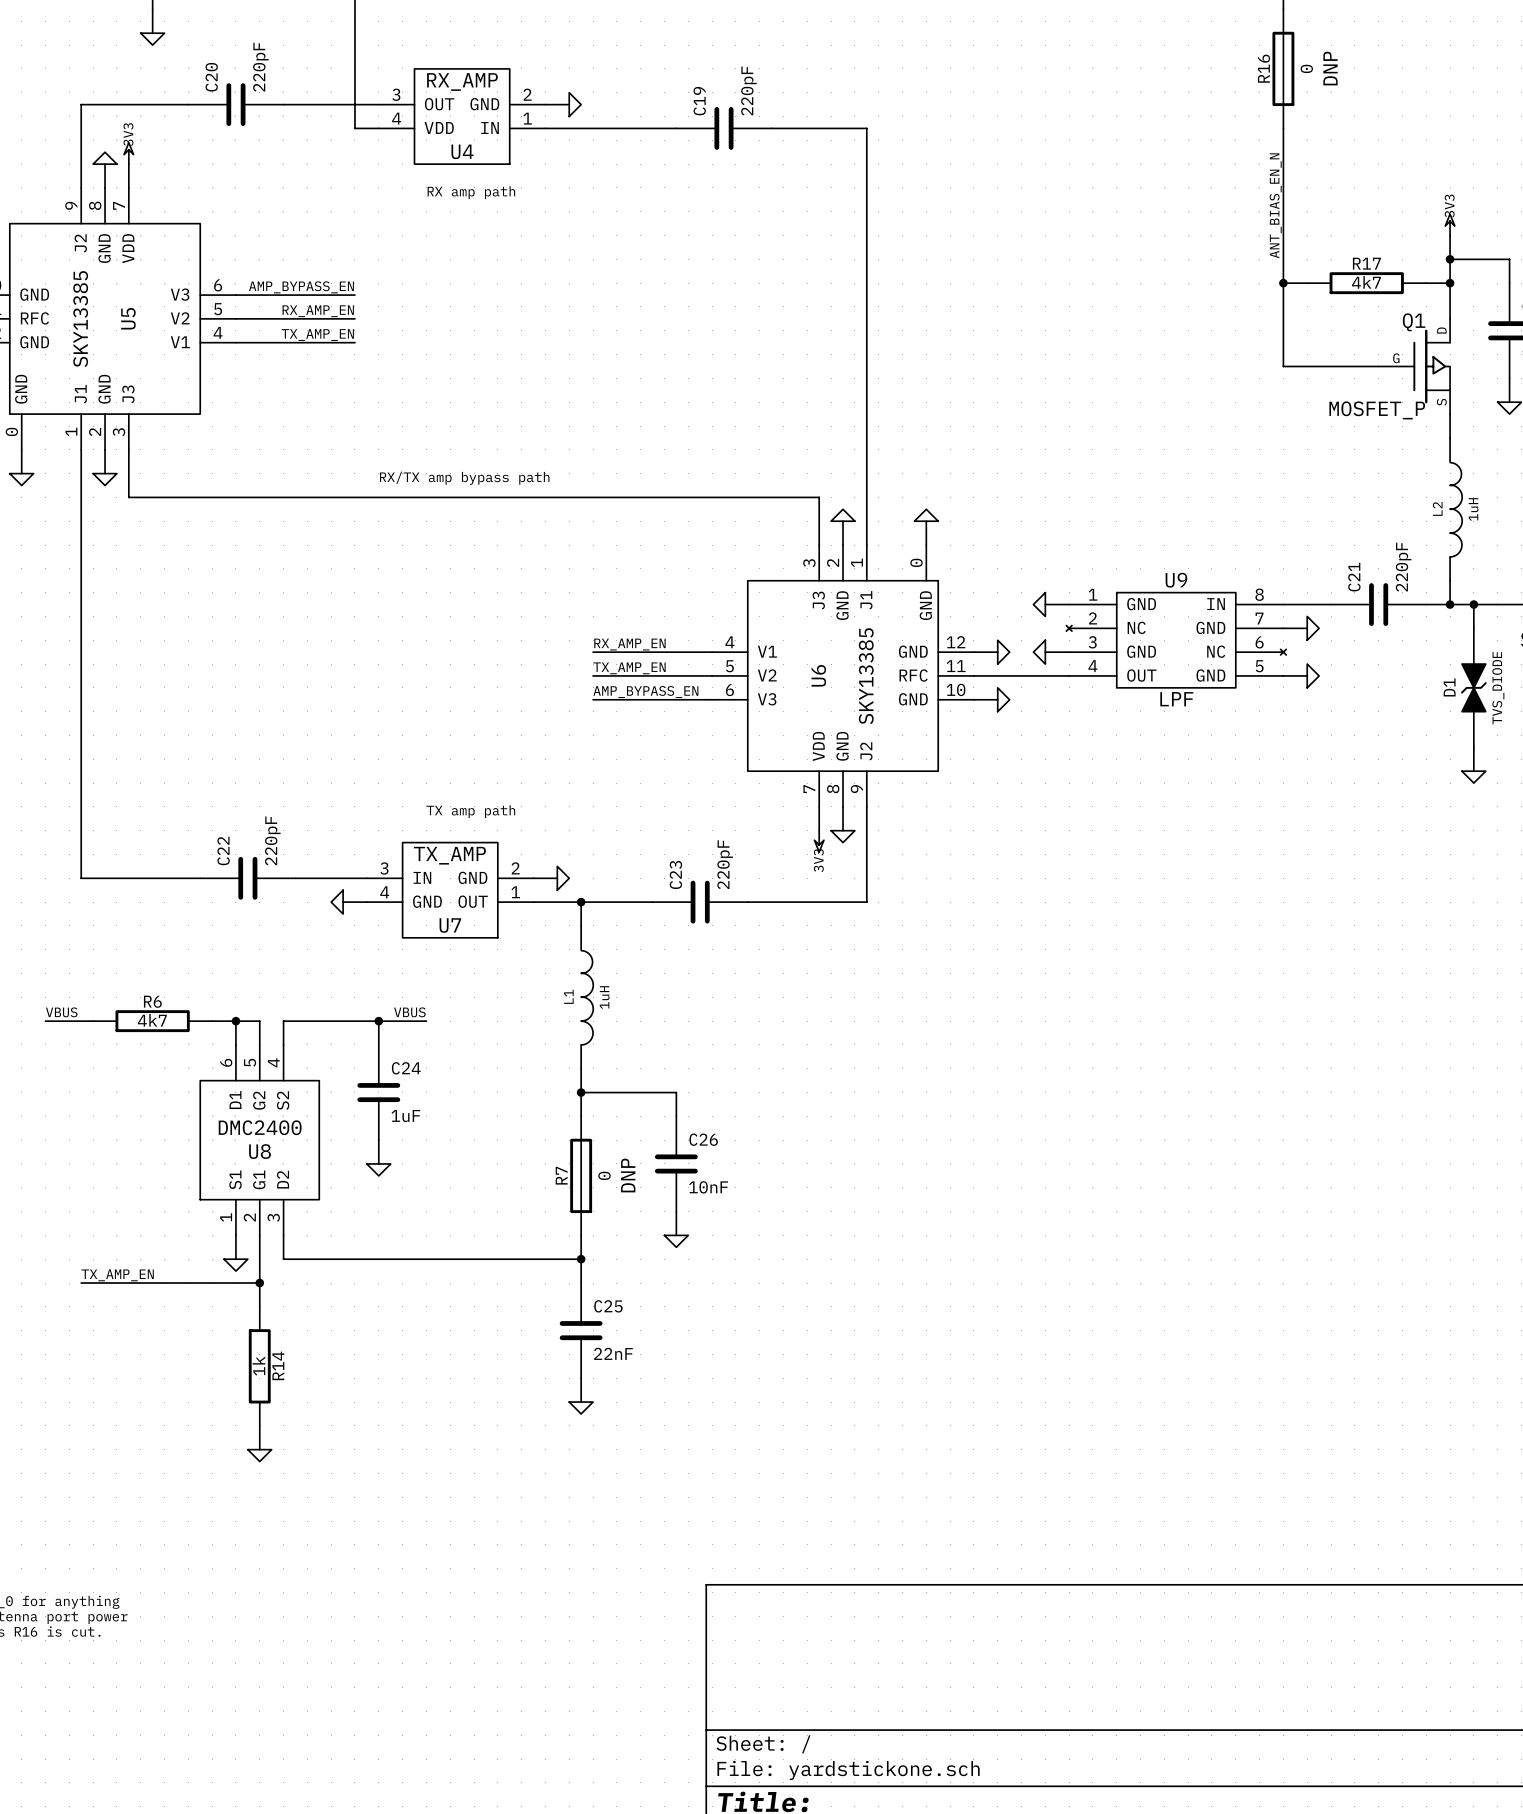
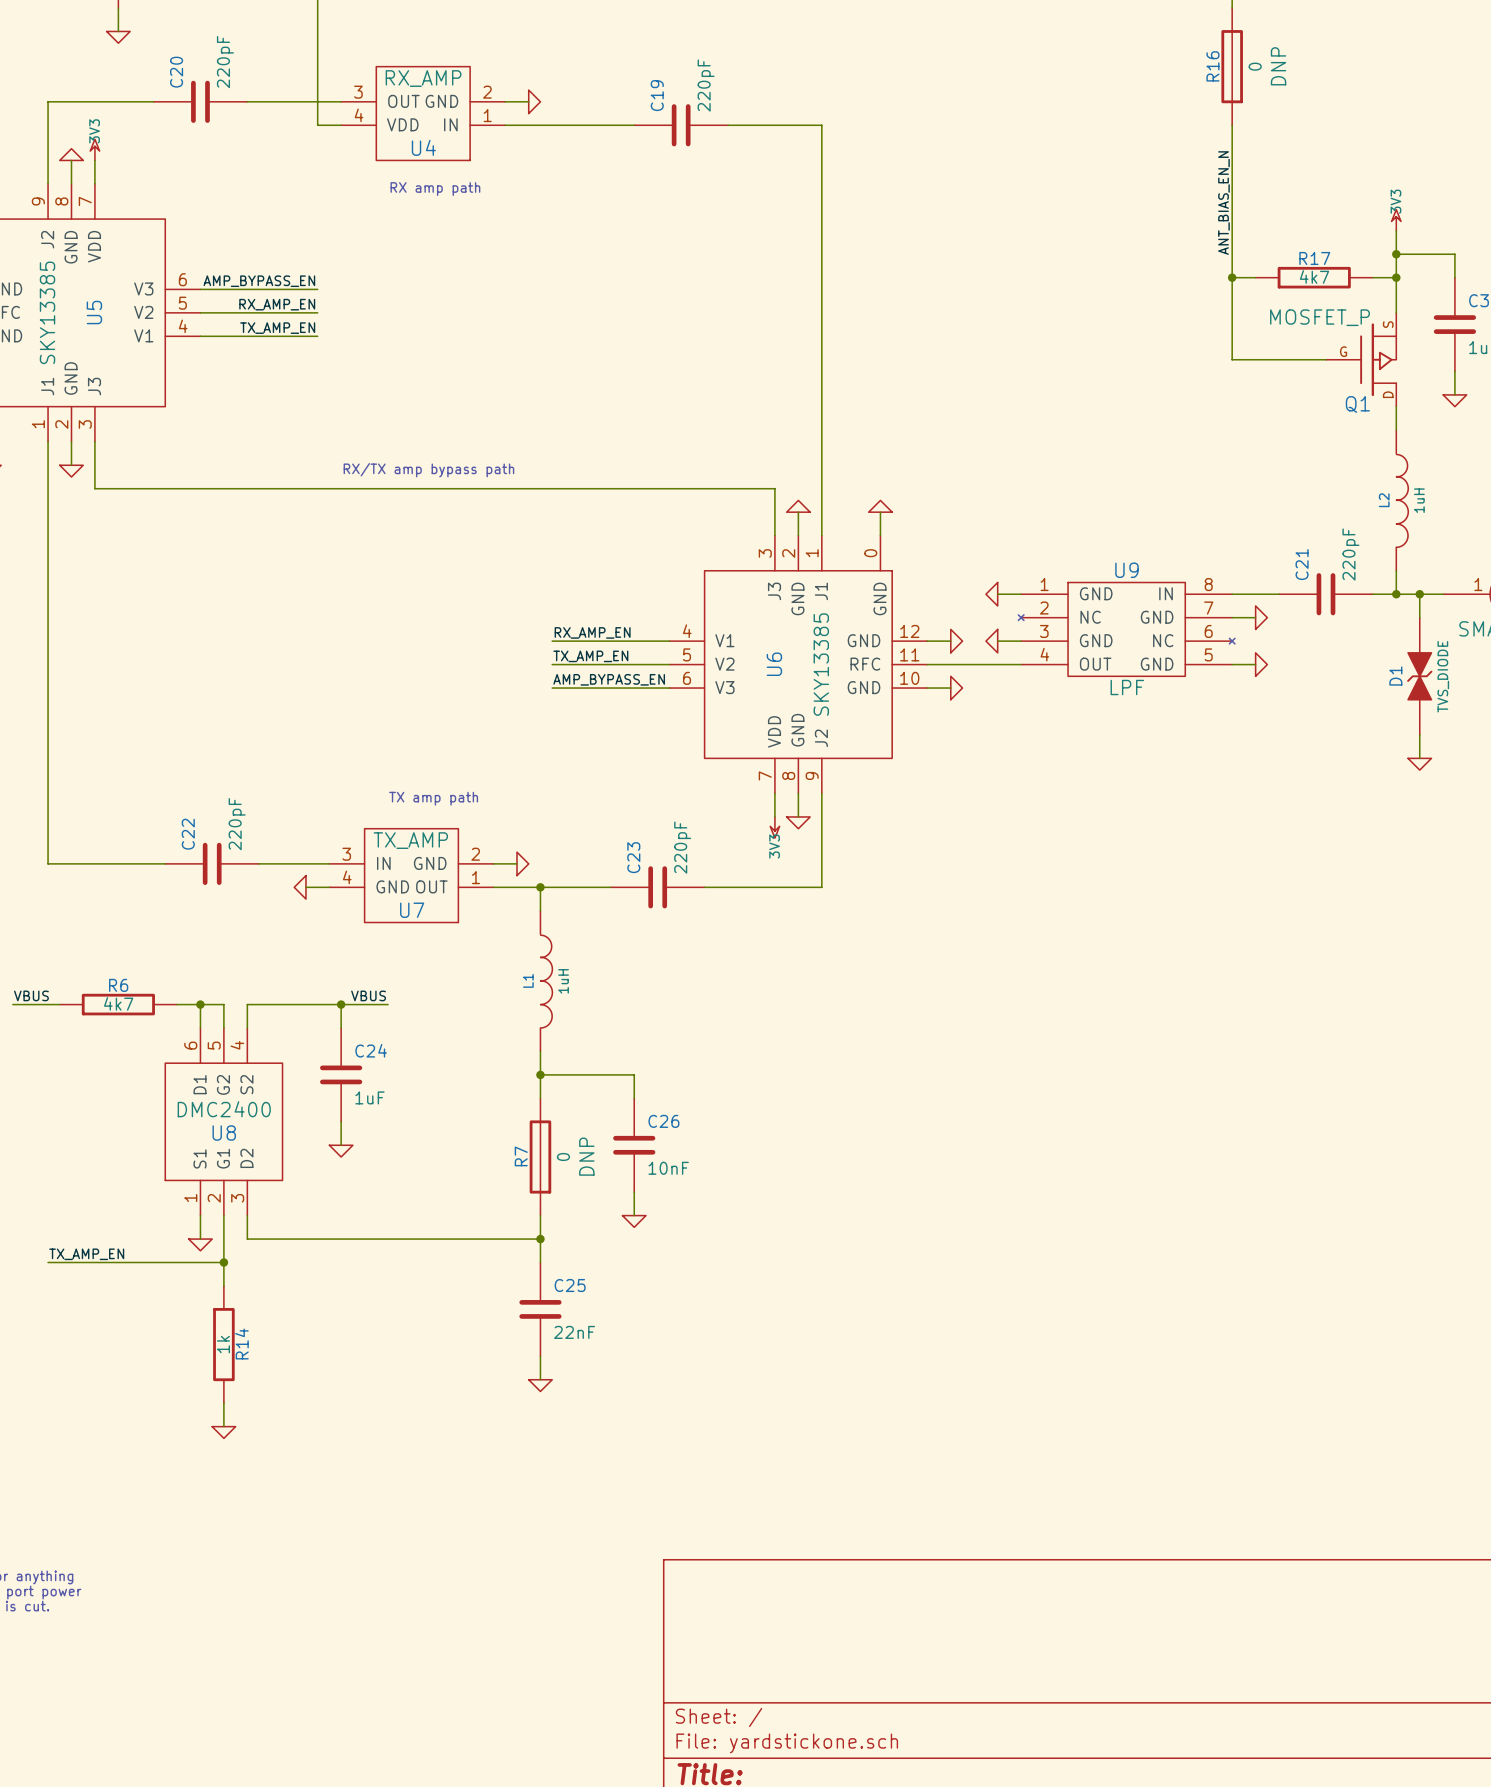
Q1 flip: as is (1431, 366) -> up-down (1378, 359)

